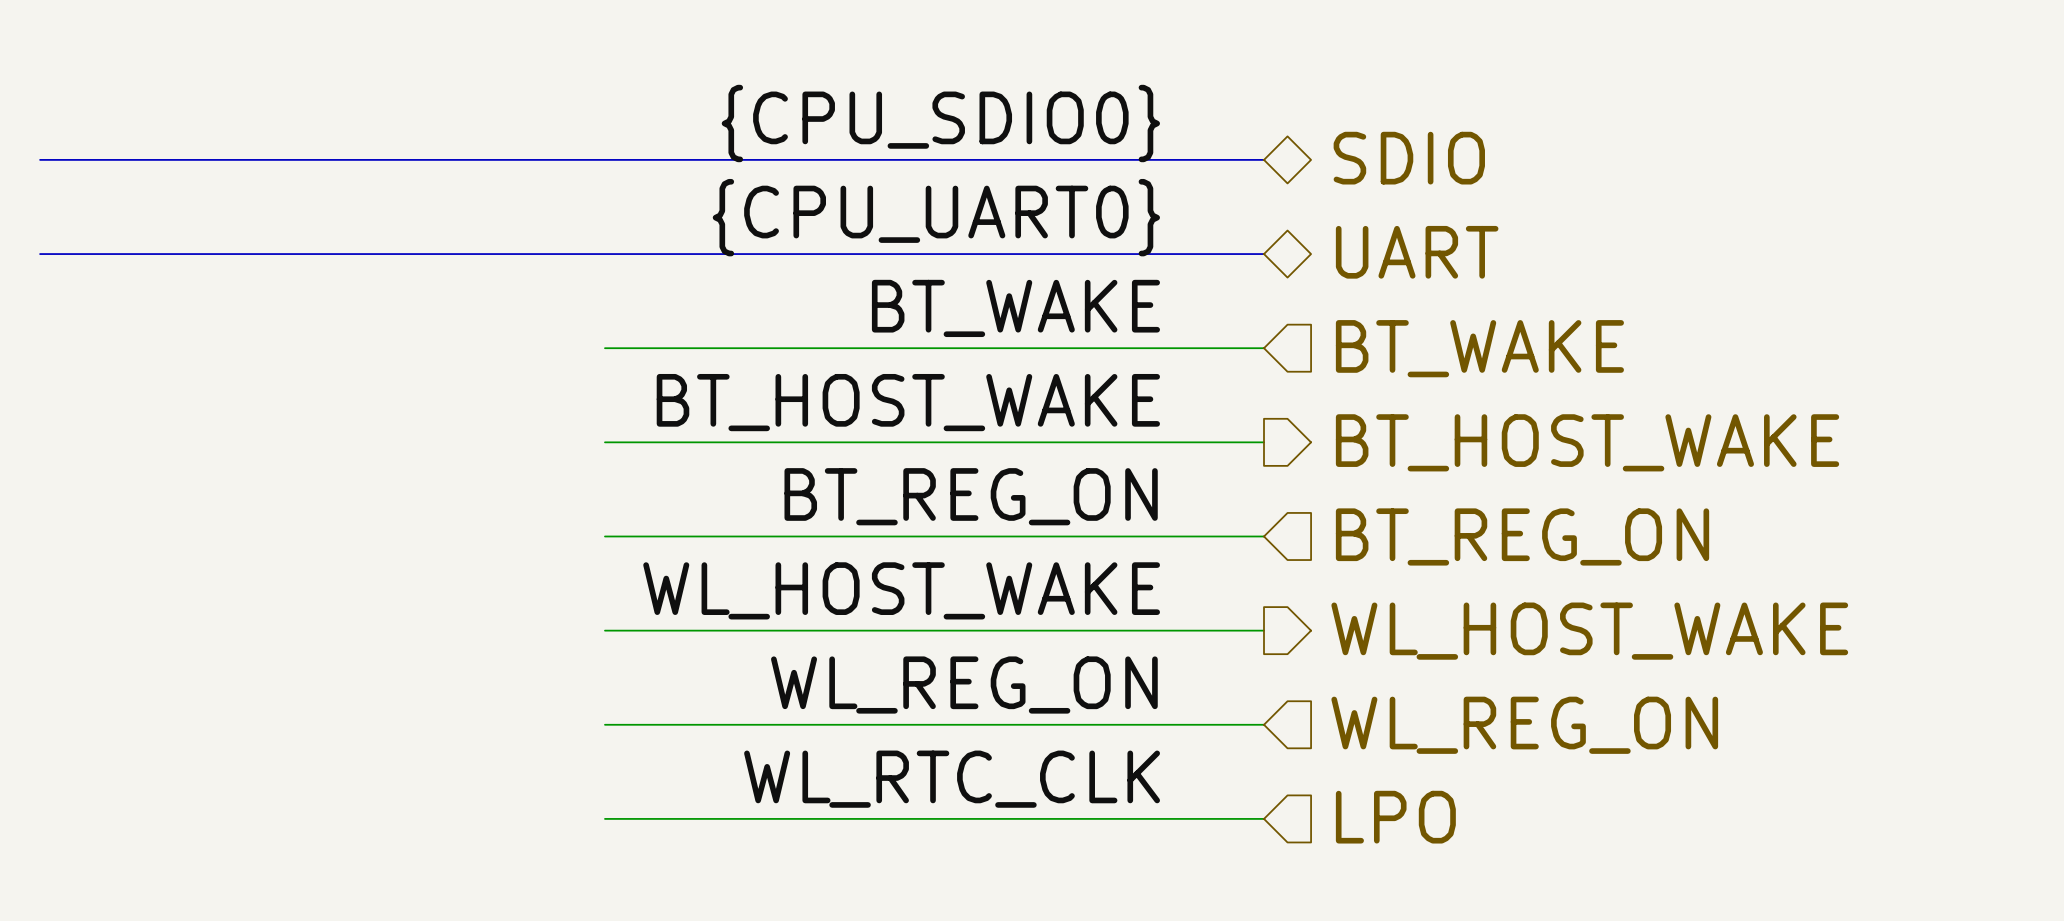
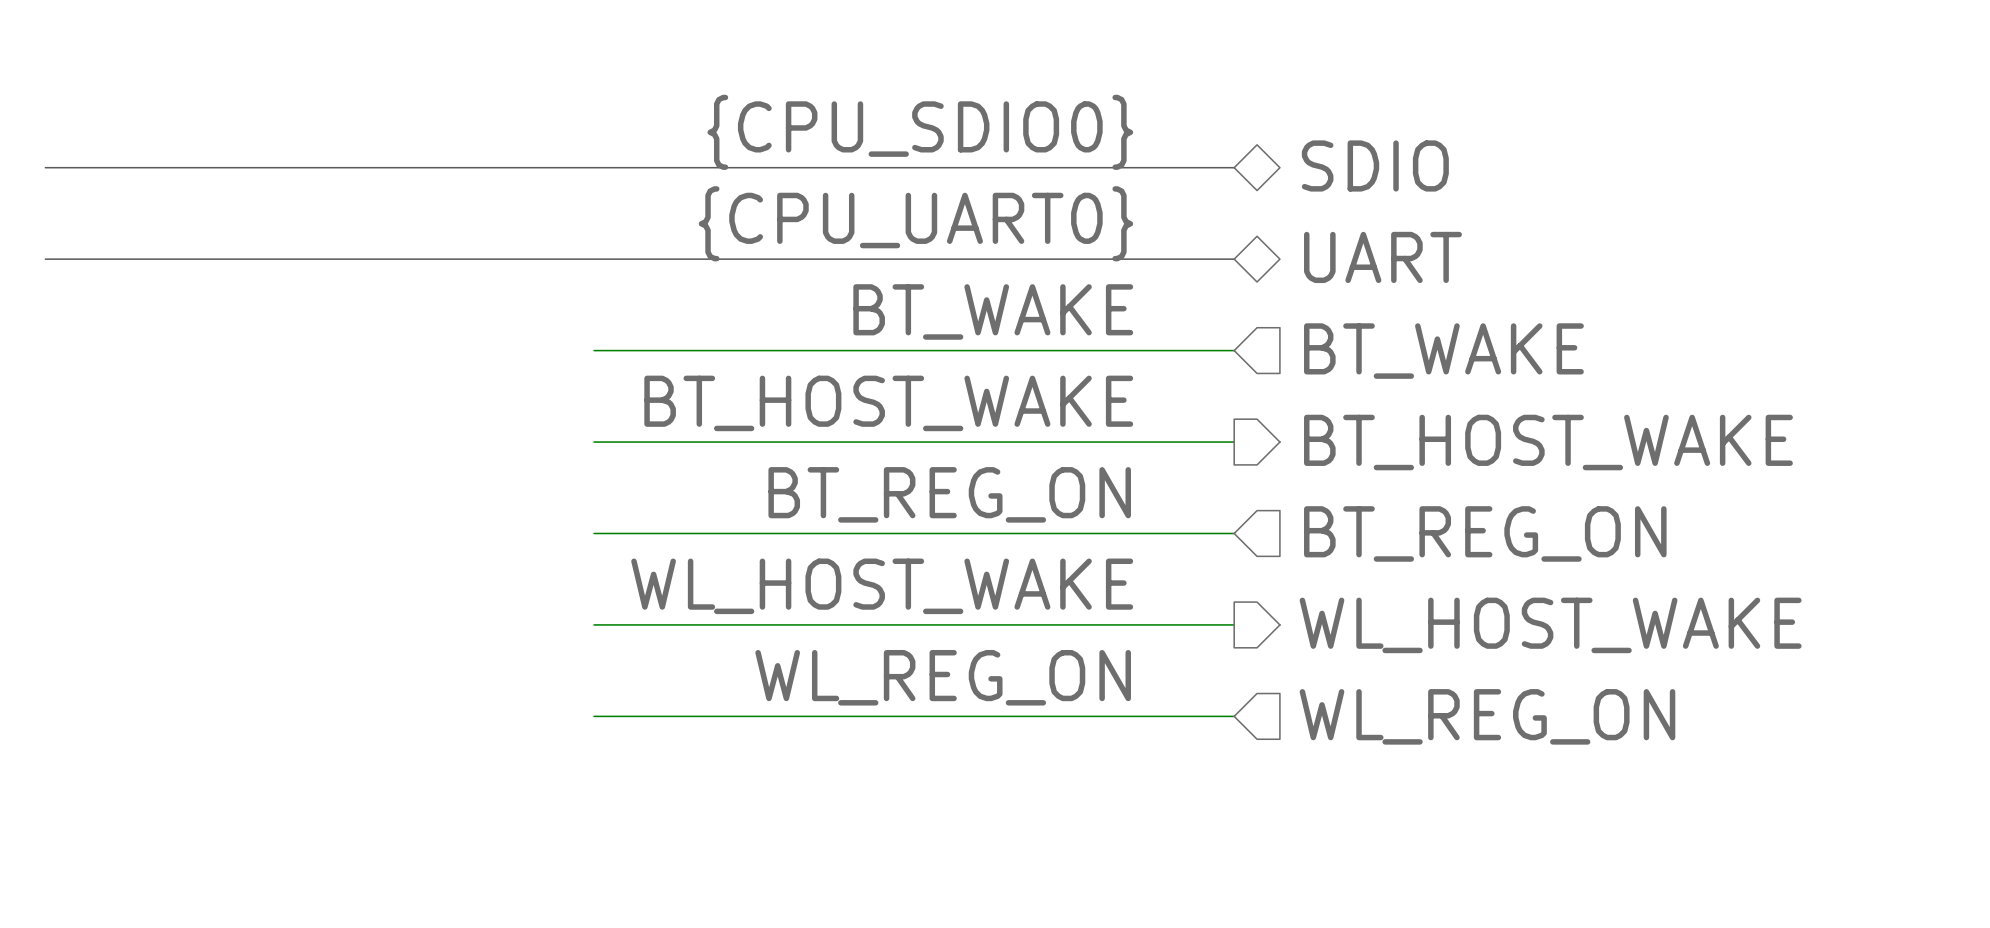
label: WL_RTC_CLK (952, 779) -> none
hierarchical label: LPO (1395, 817) -> none
wire: (604, 818) (1263, 818) -> none

